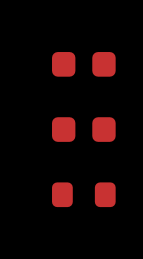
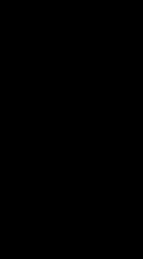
part: (83, 64) -> none
part: (83, 129) -> none
part: (83, 194) -> none

